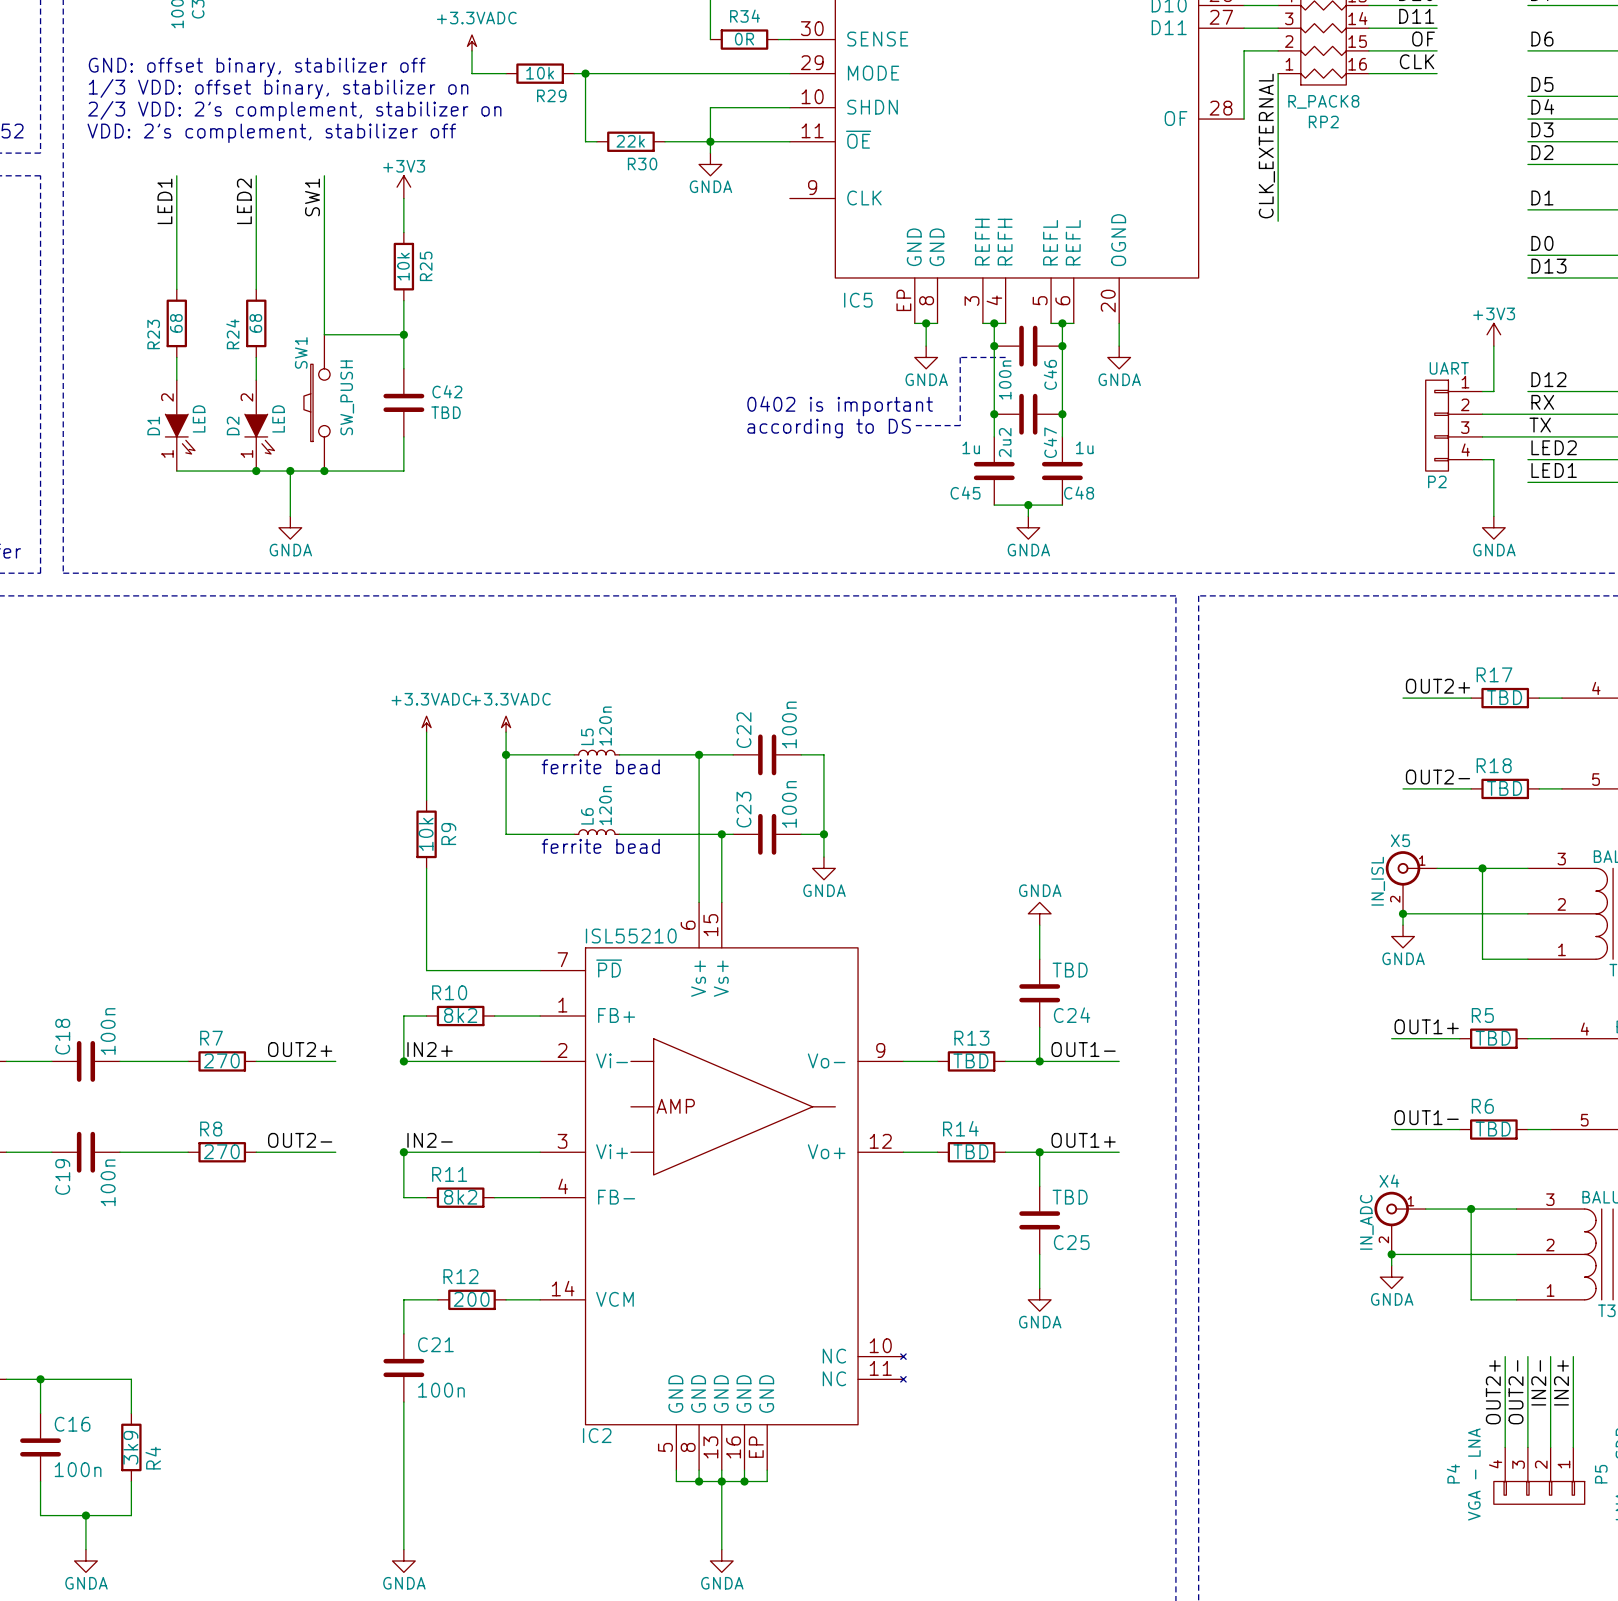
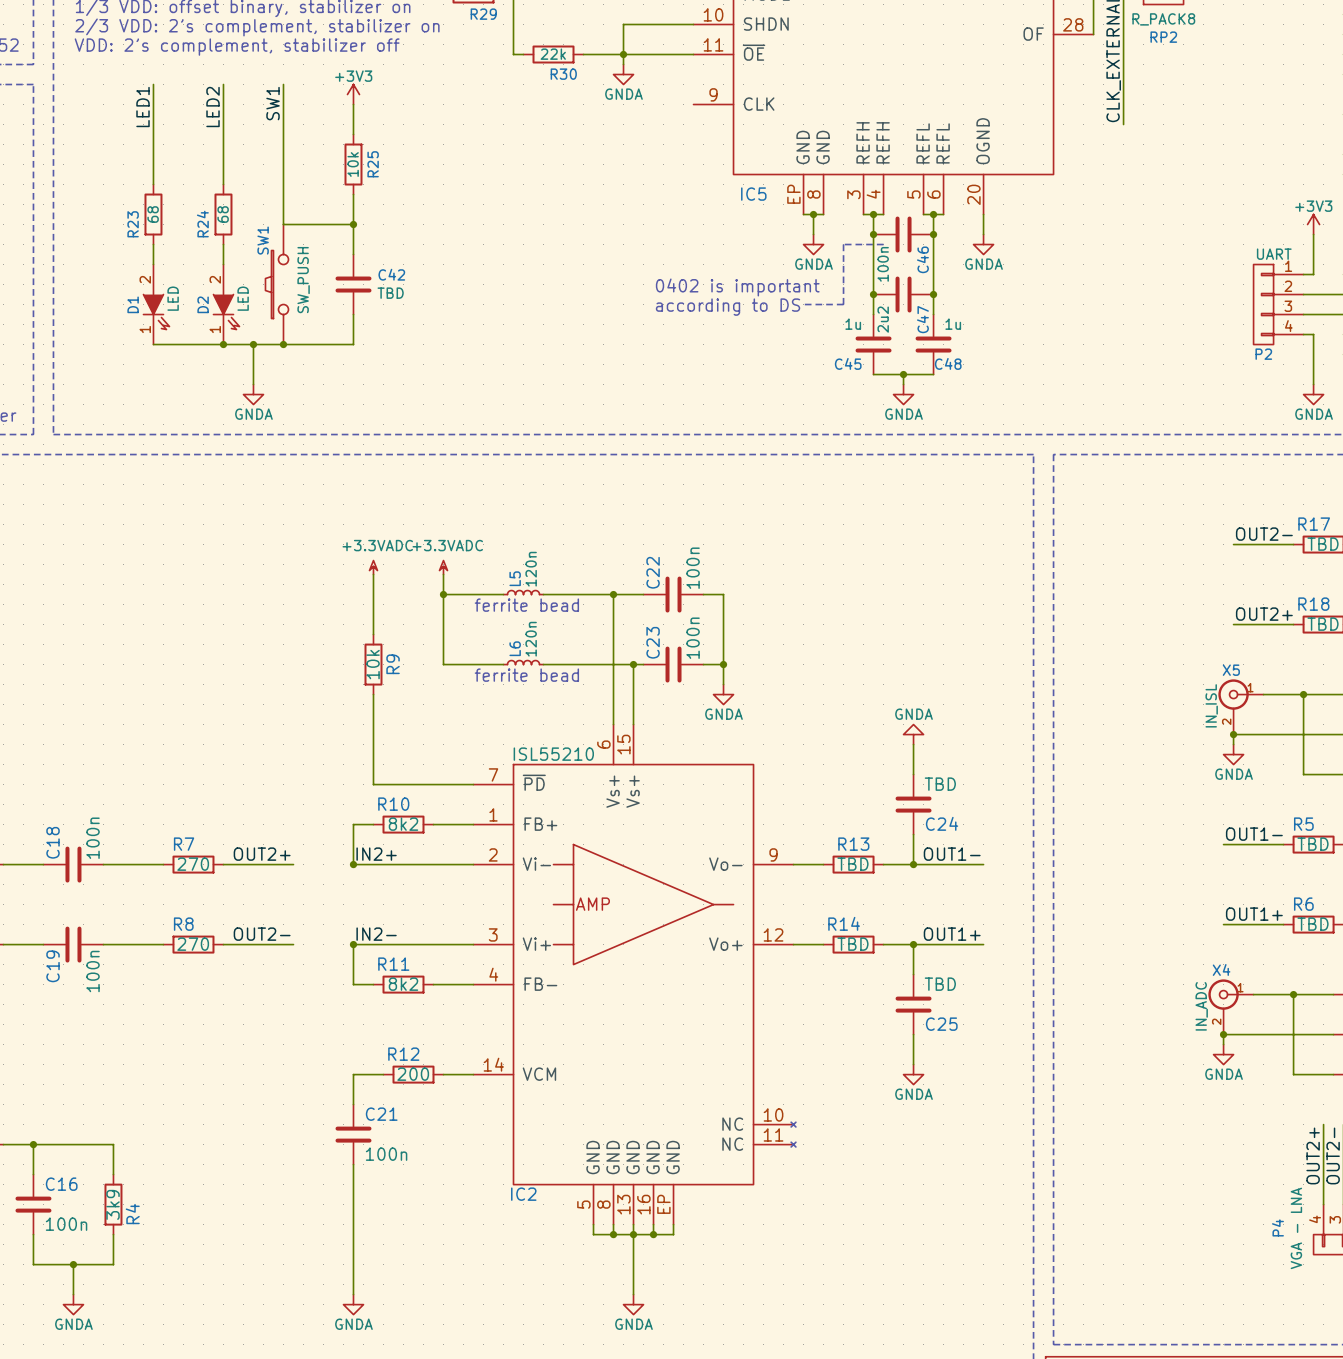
label: OUT2+ (1437, 686) -> OUT2- (1264, 534)
label: OUT2- (1437, 777) -> OUT2+ (1264, 614)
label: OUT1+ (1426, 1026) -> OUT1- (1254, 834)
label: OUT1- (1426, 1117) -> OUT1+ (1254, 914)

